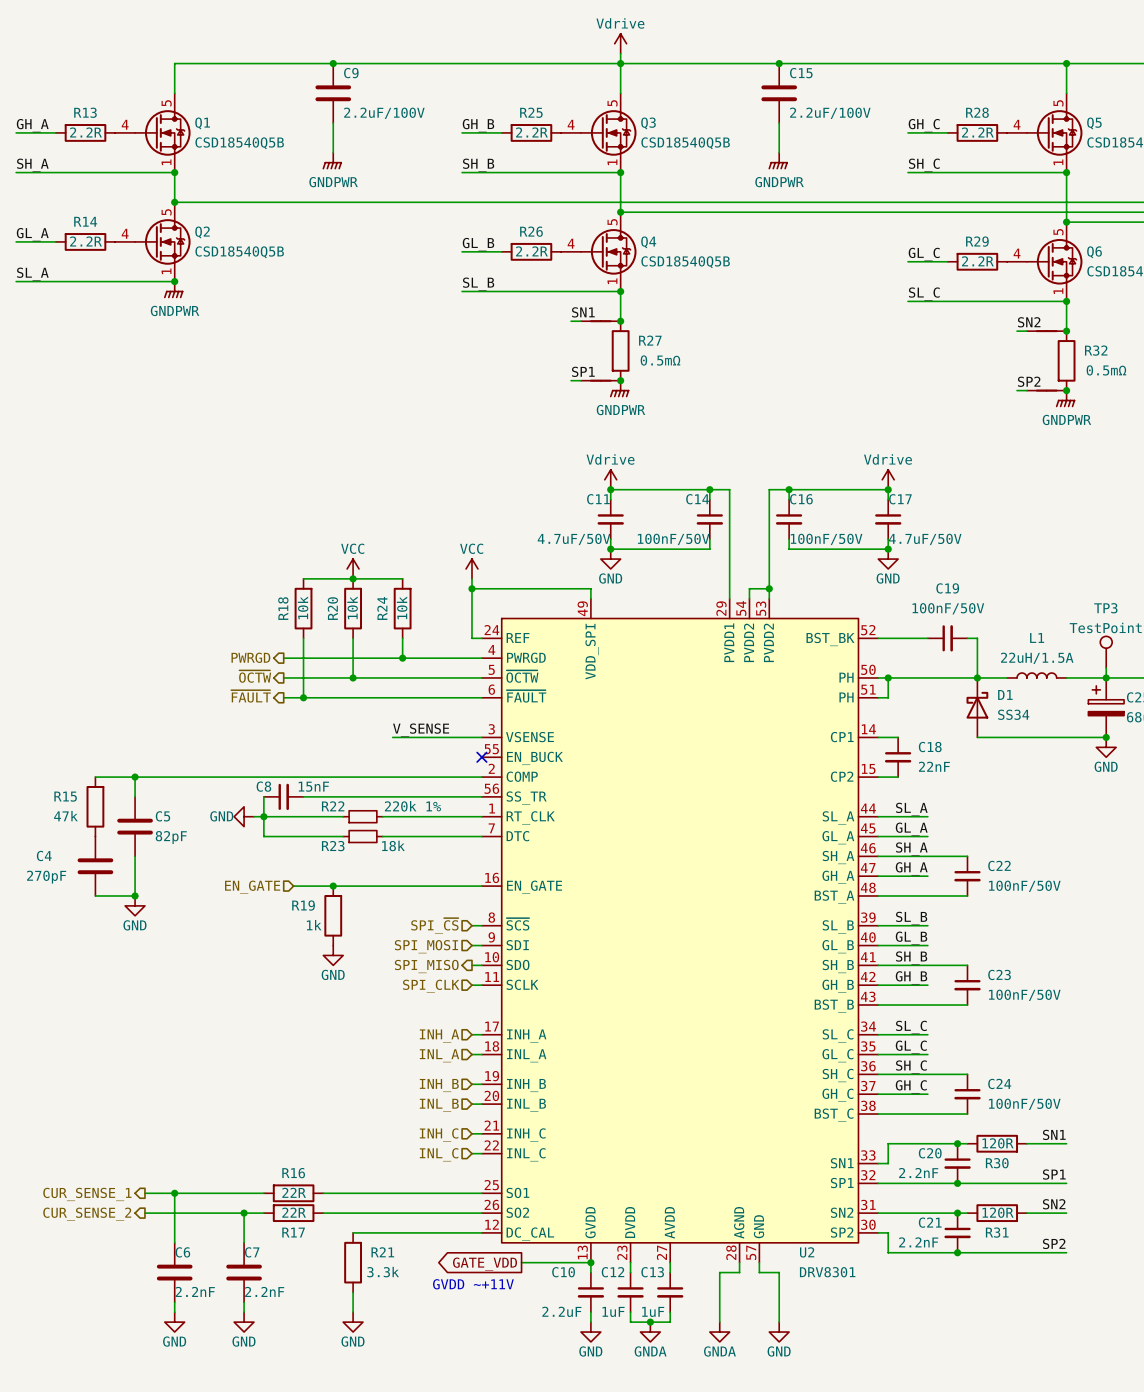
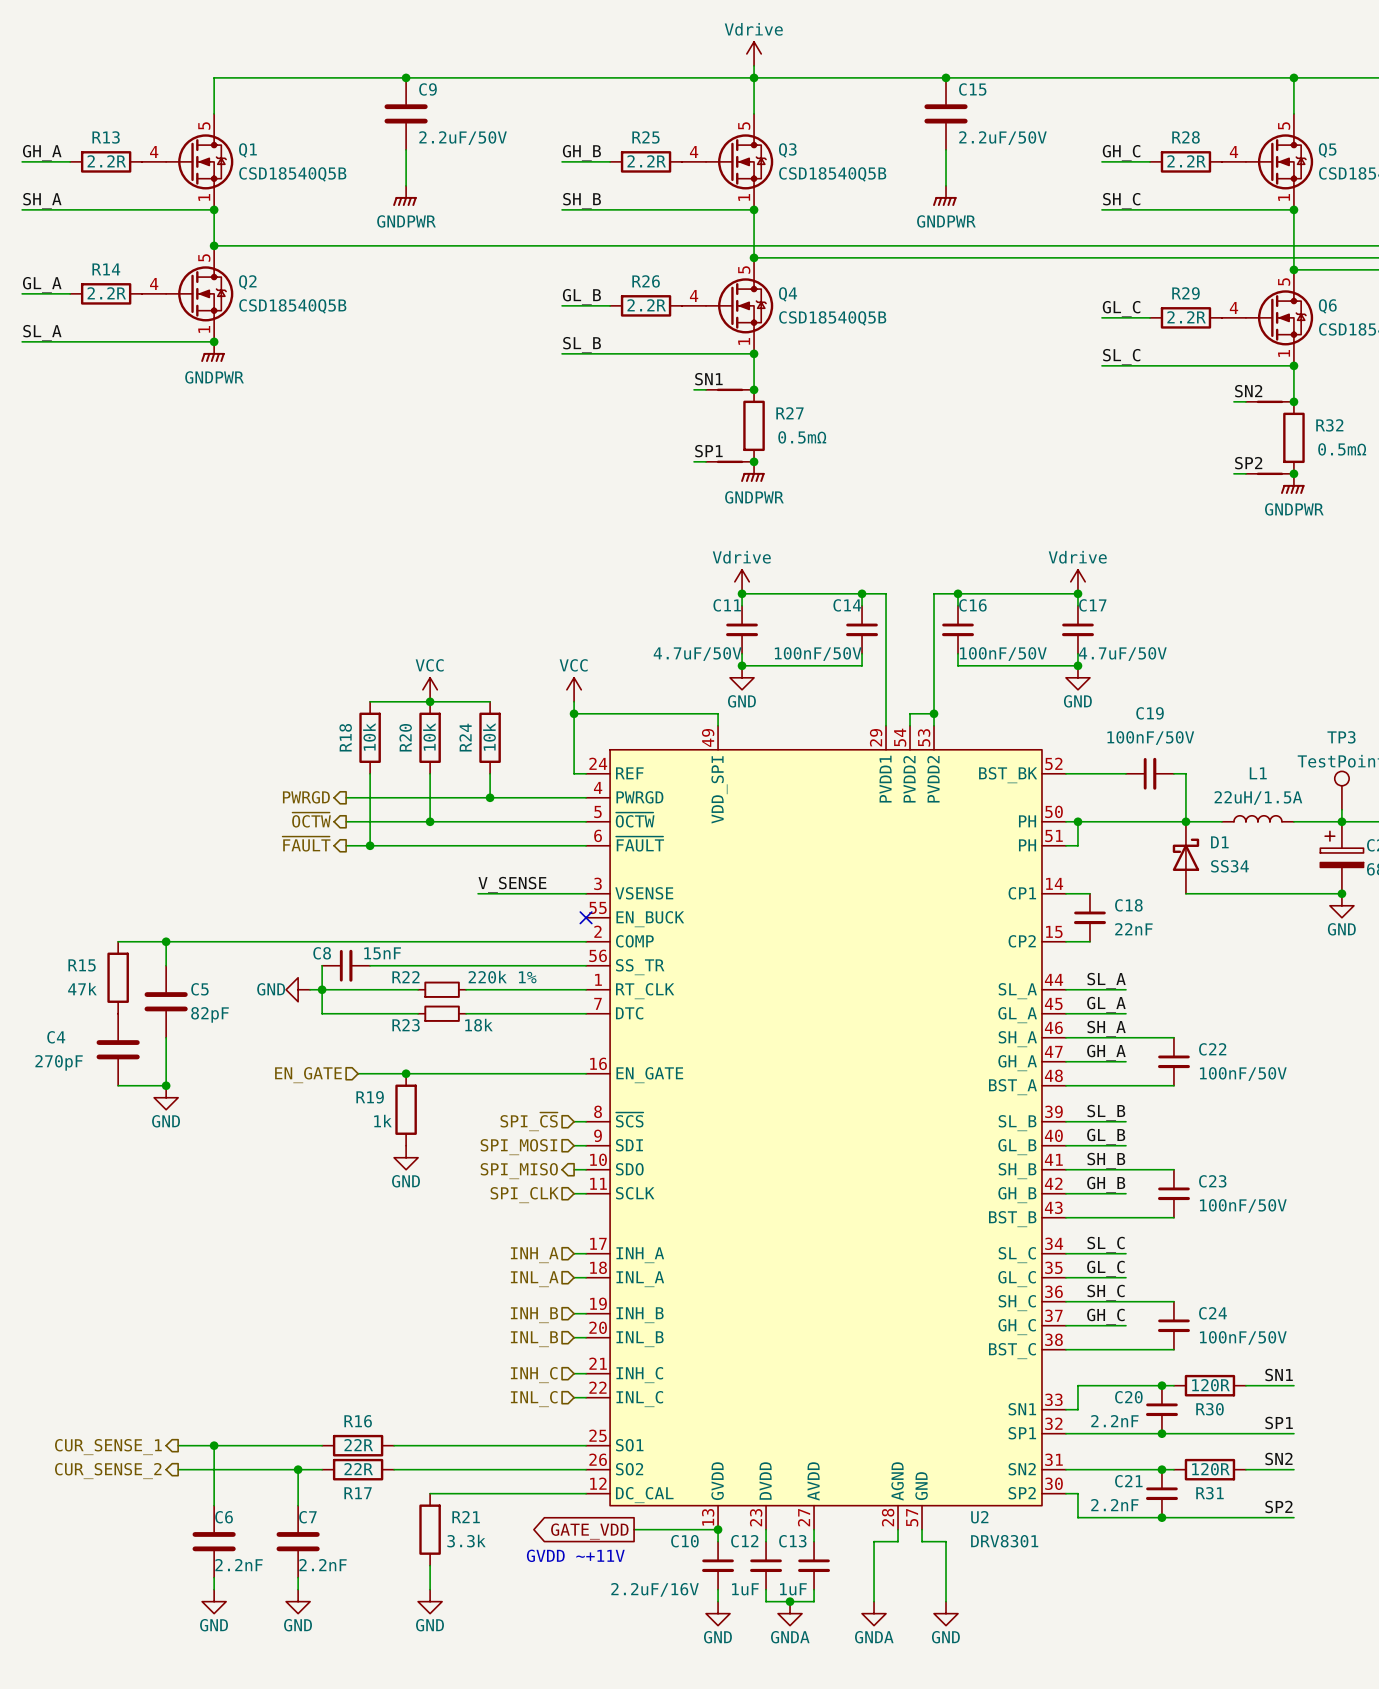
C9 value: 2.2uF/100V (384, 113) -> 2.2uF/50V (463, 138)
C15 value: 2.2uF/100V (830, 113) -> 2.2uF/50V (1002, 138)
C10 value: 2.2uF (561, 1311) -> 2.2uF/16V (655, 1589)

